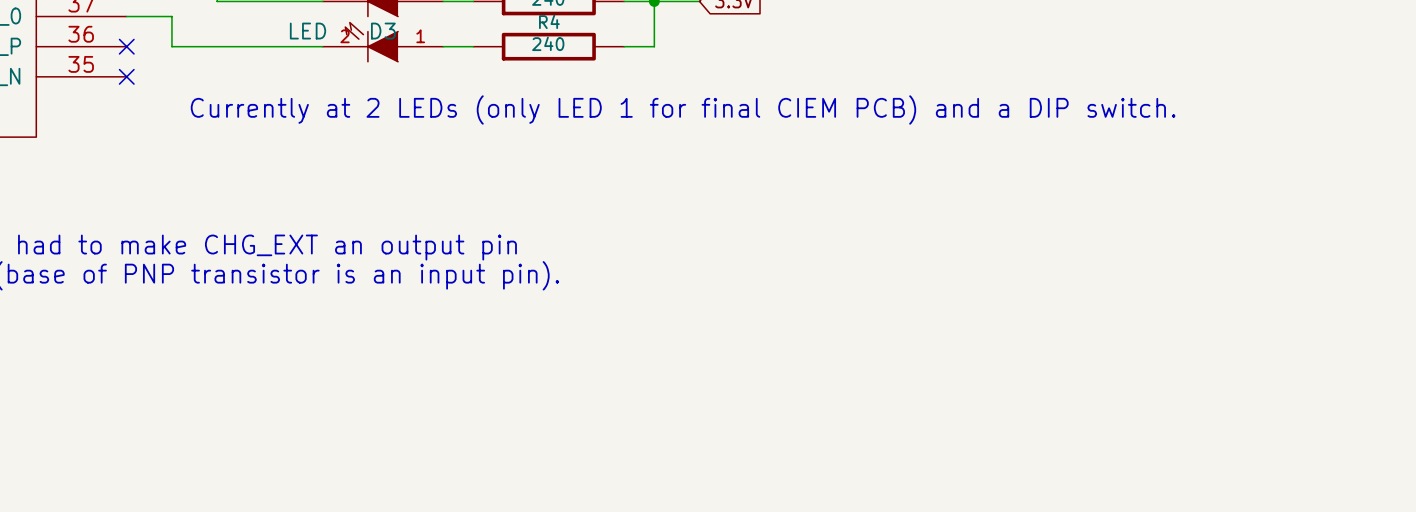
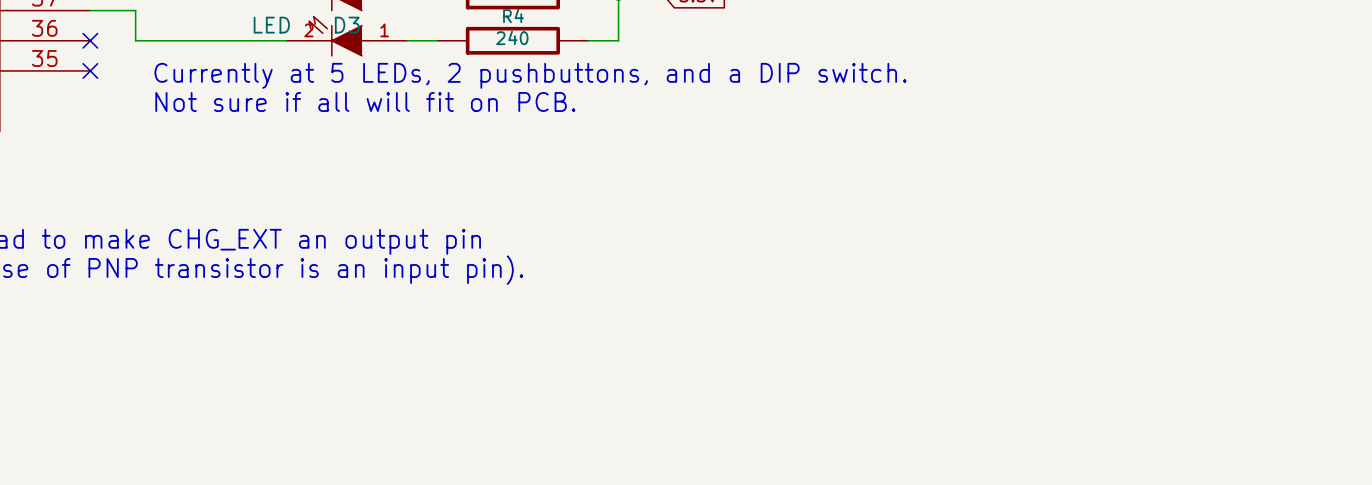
text: none -> Currently at 5 LEDs, 2 pushbuttons, and a DIP switch. (530, 75)
text: Currently at 2 LEDs (only LED 1 for final CIEM PCB) and a DIP switch. (683, 109) -> Not sure if all will fit on PCB. (365, 101)

